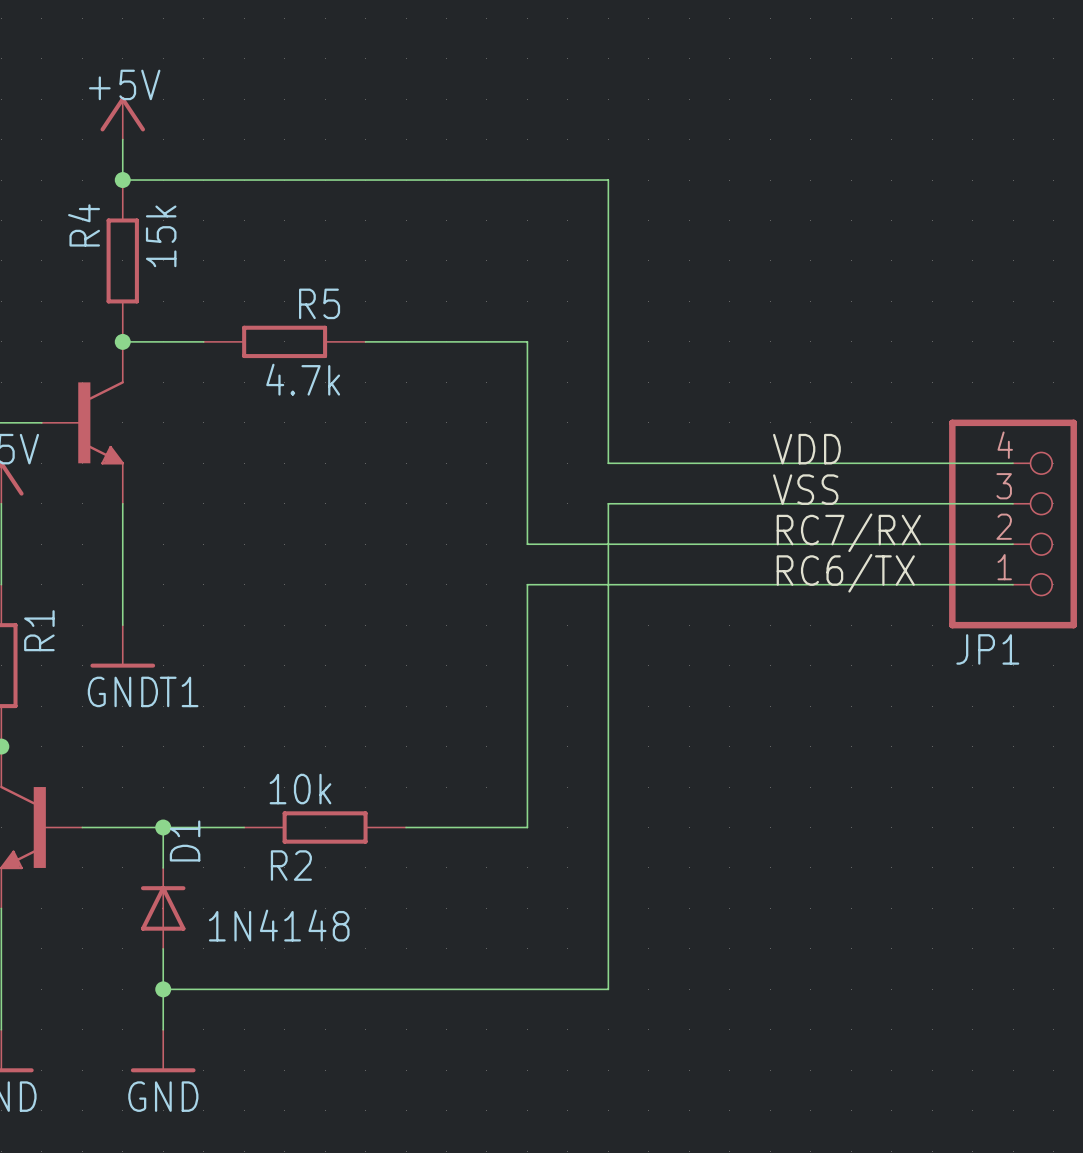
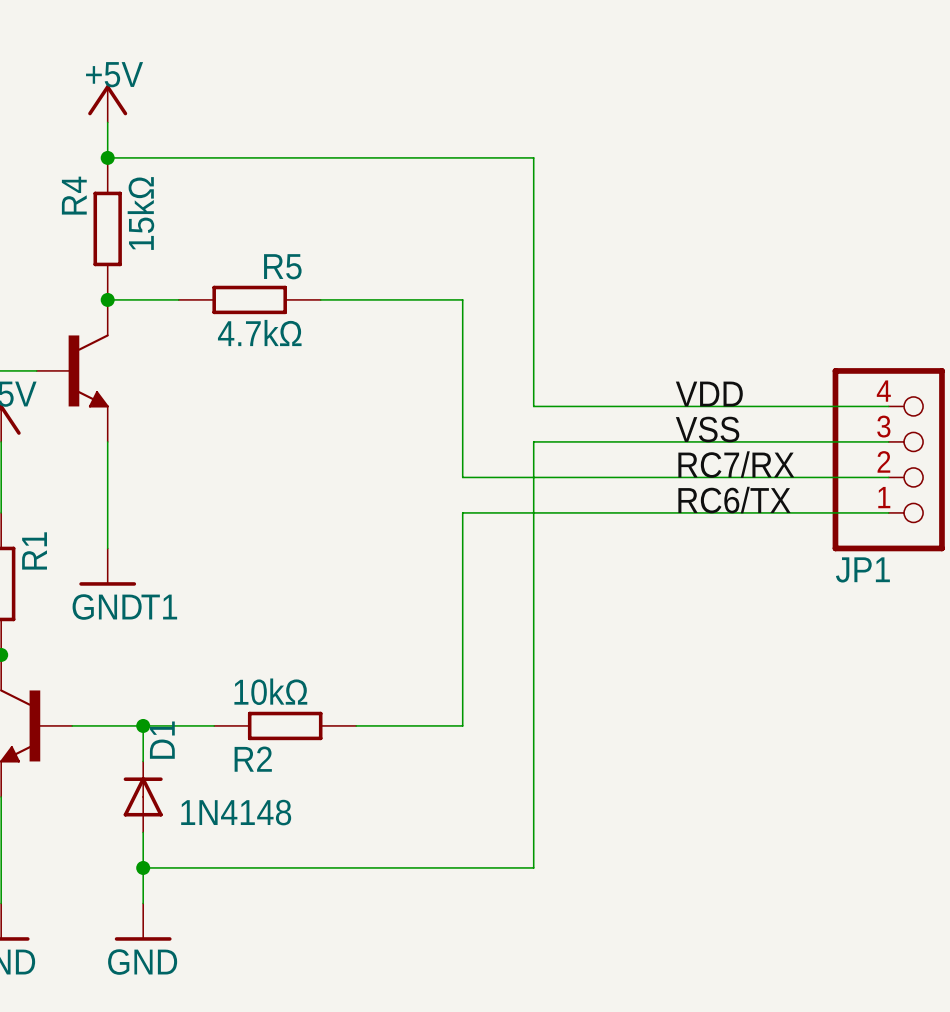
R4 value: 15k (161, 236) -> 15kΩ (140, 213)
R5 value: 4.7k (303, 379) -> 4.7kΩ (259, 333)
R2 value: 10k (300, 789) -> 10kΩ (270, 691)

